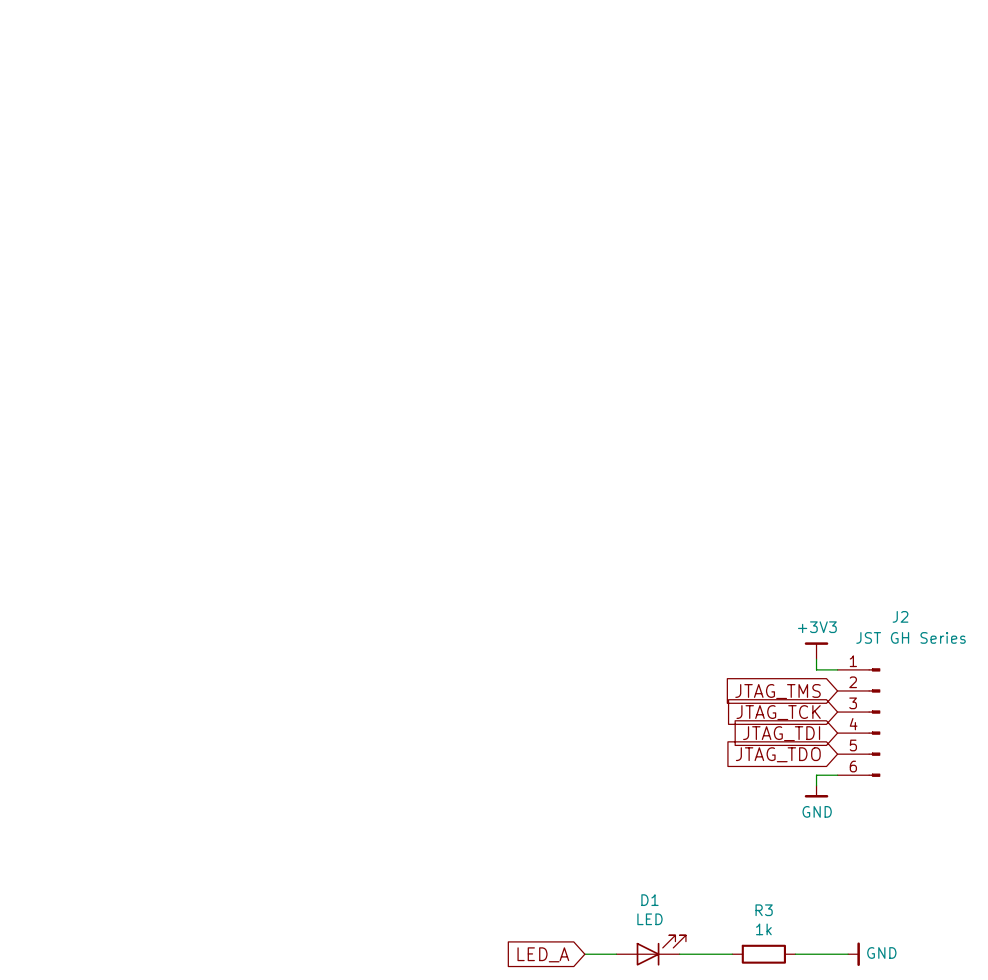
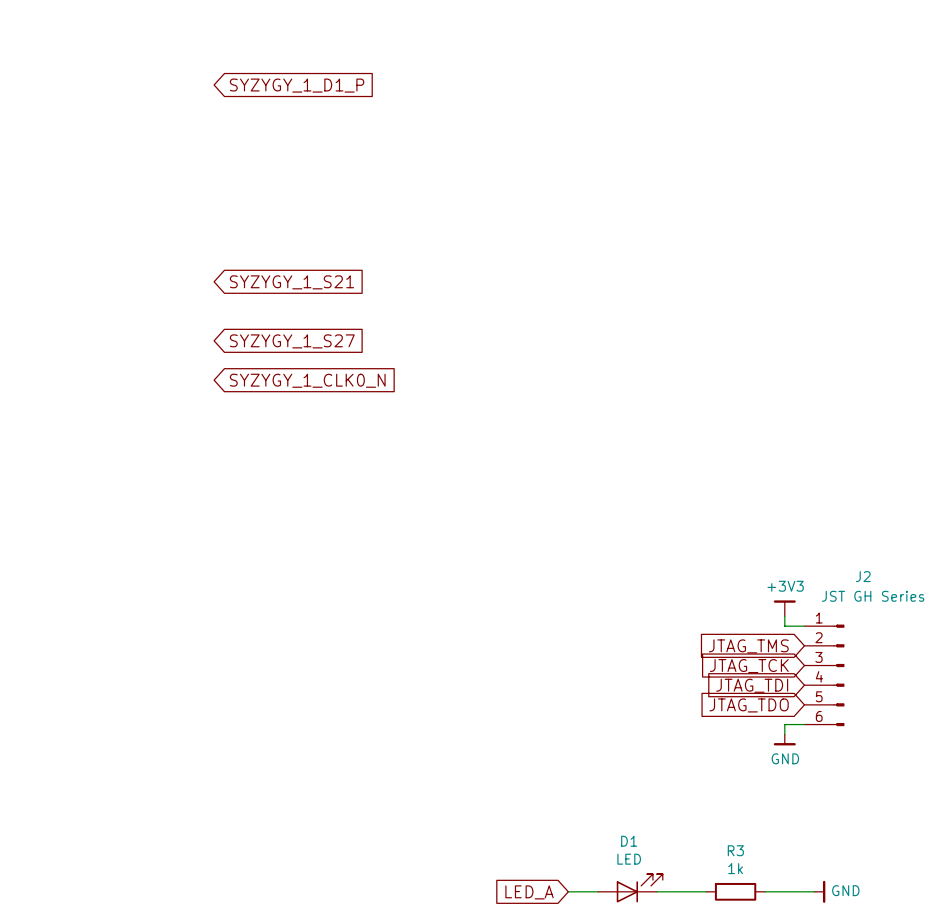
global label: none -> SYZYGY_1_D1_P (297, 85)
global label: none -> SYZYGY_1_S21 (291, 282)
global label: none -> SYZYGY_1_S27 (292, 341)
global label: none -> SYZYGY_1_CLK0_N (307, 380)

